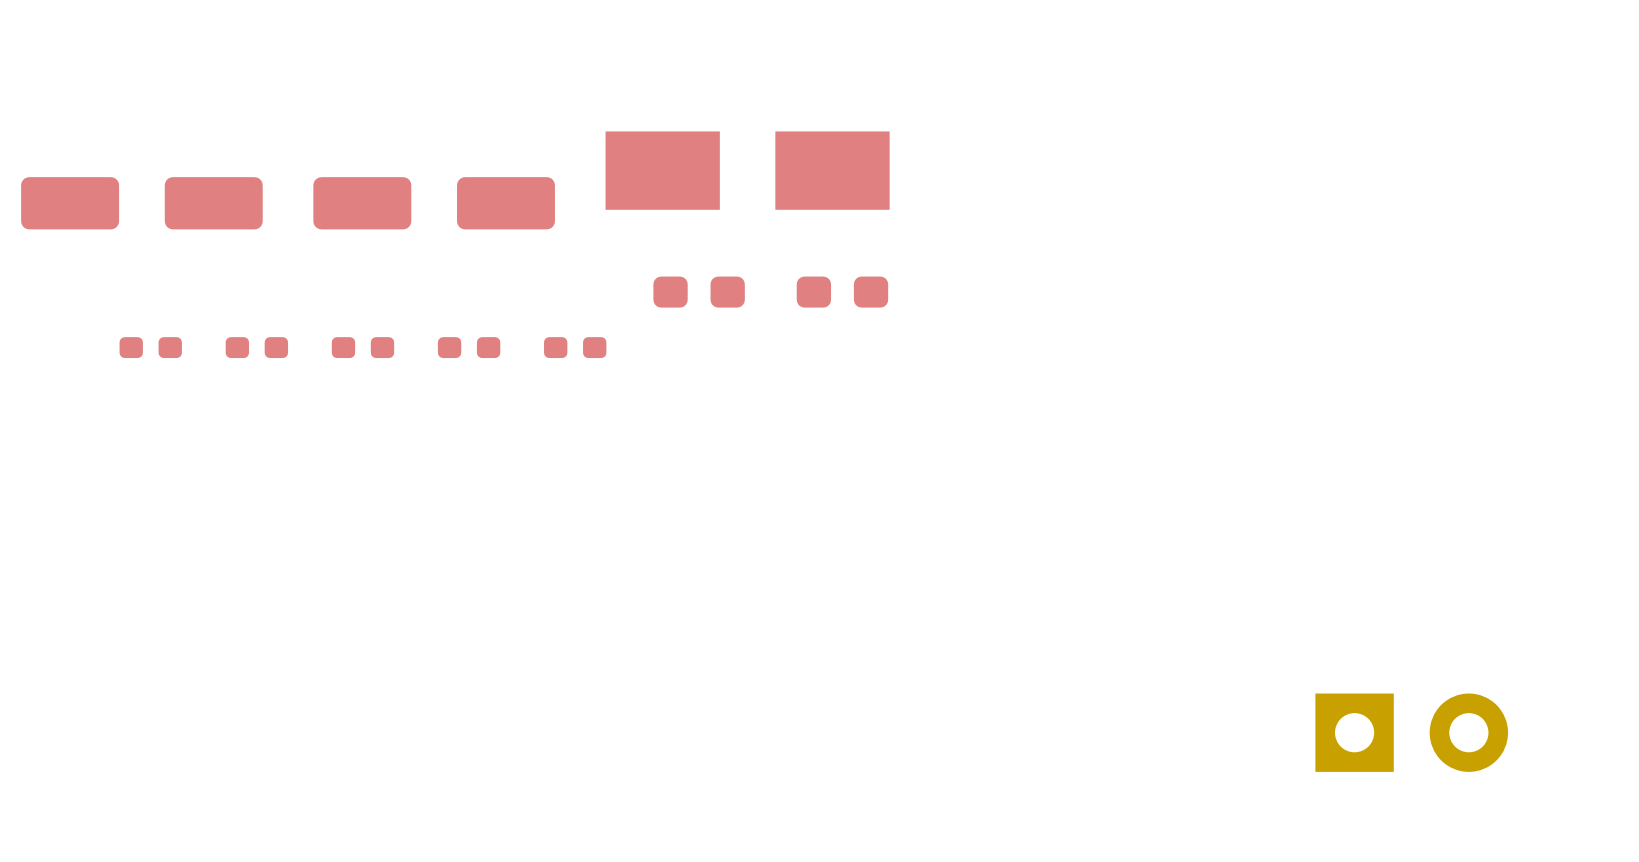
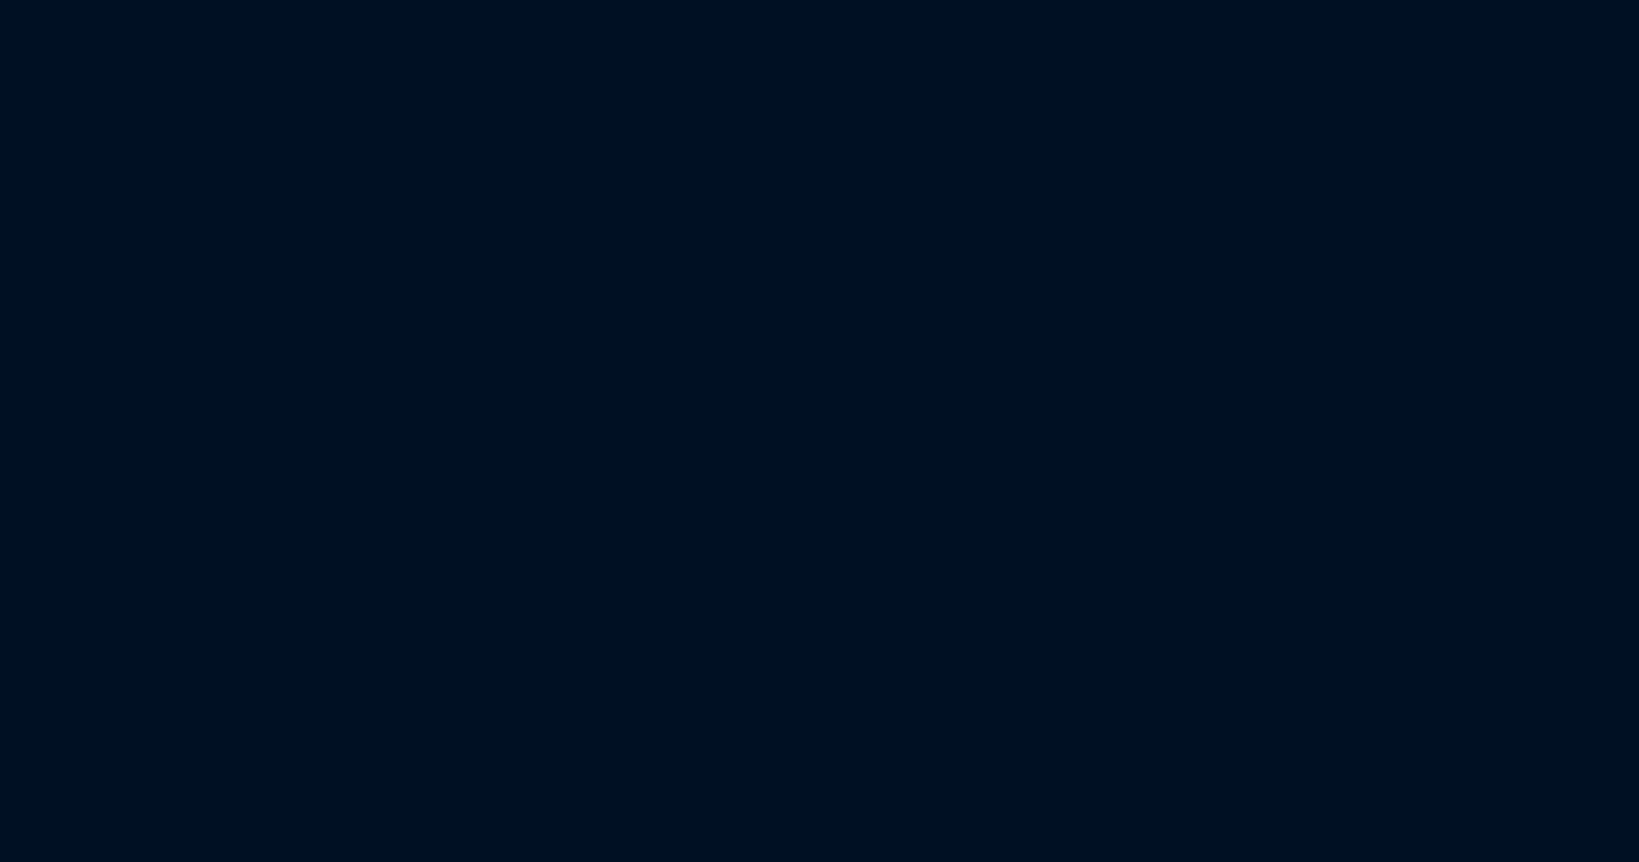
part: (747, 170) -> none
part: (141, 203) -> none
part: (434, 203) -> none
part: (699, 292) -> none
part: (842, 292) -> none
part: (150, 347) -> none
part: (256, 347) -> none
part: (362, 347) -> none
part: (469, 347) -> none
part: (575, 347) -> none
part: (1411, 732) -> none

